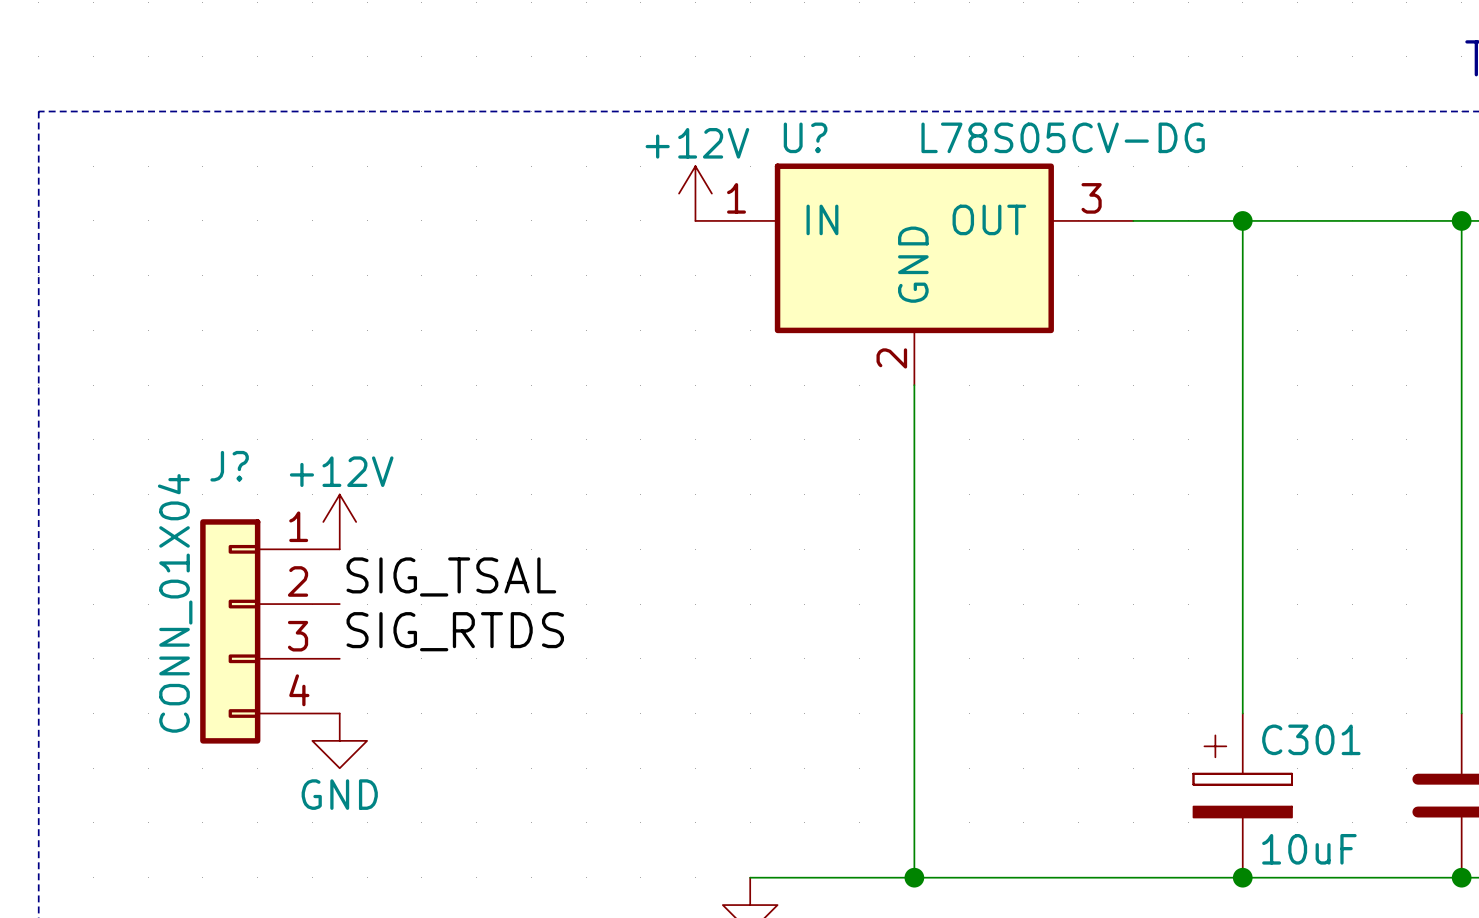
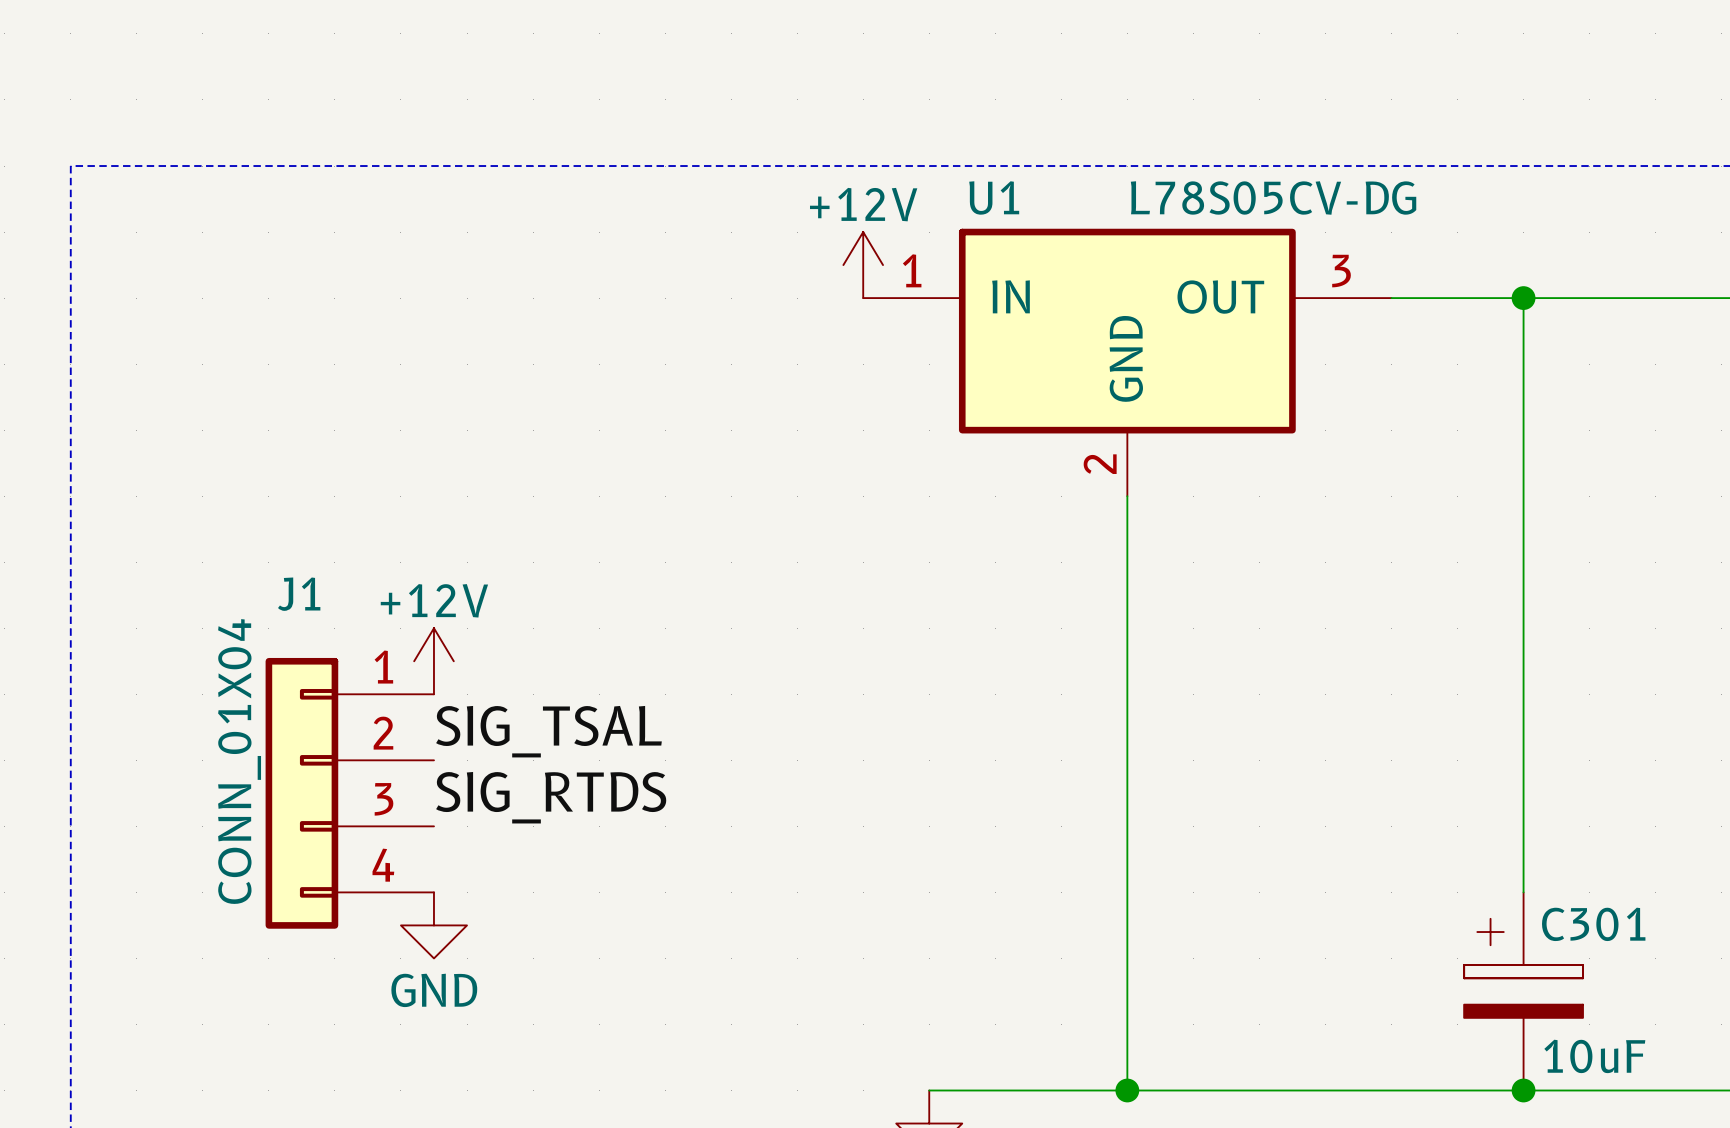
U? name: U? (805, 137) -> U1 (994, 197)
J? name: J? (229, 466) -> J1 (299, 594)

